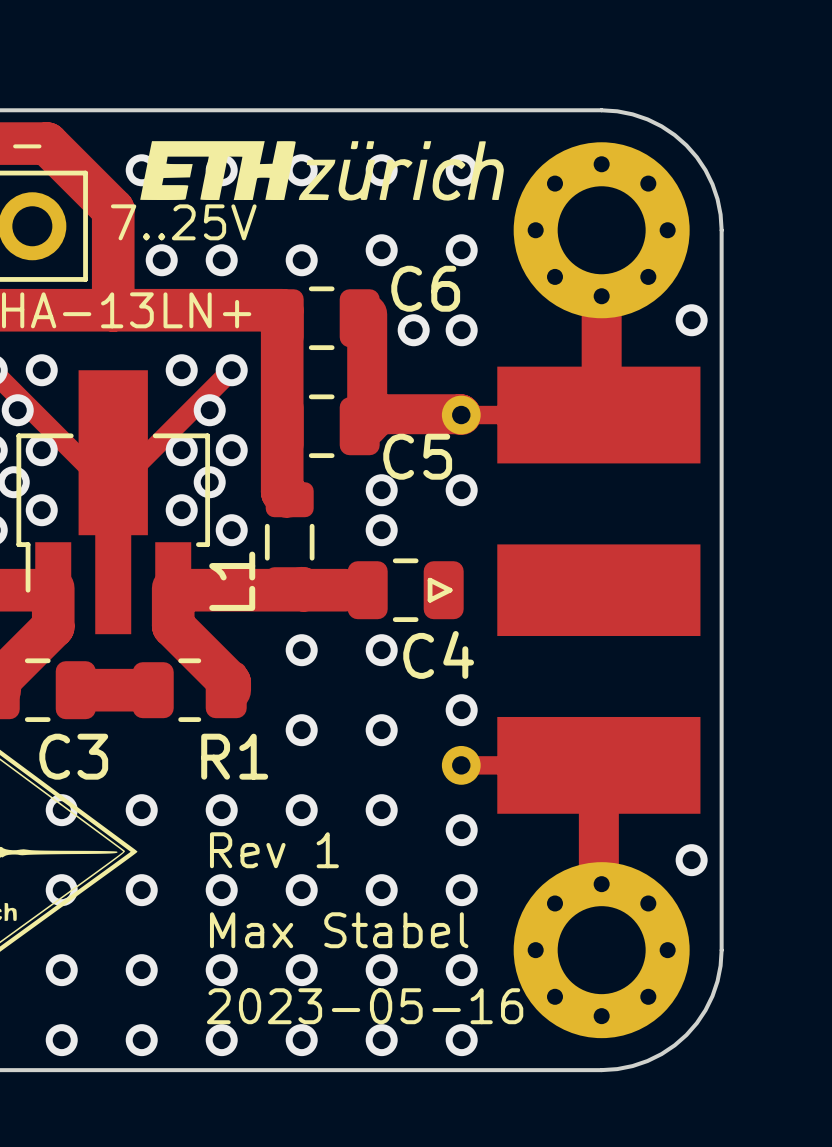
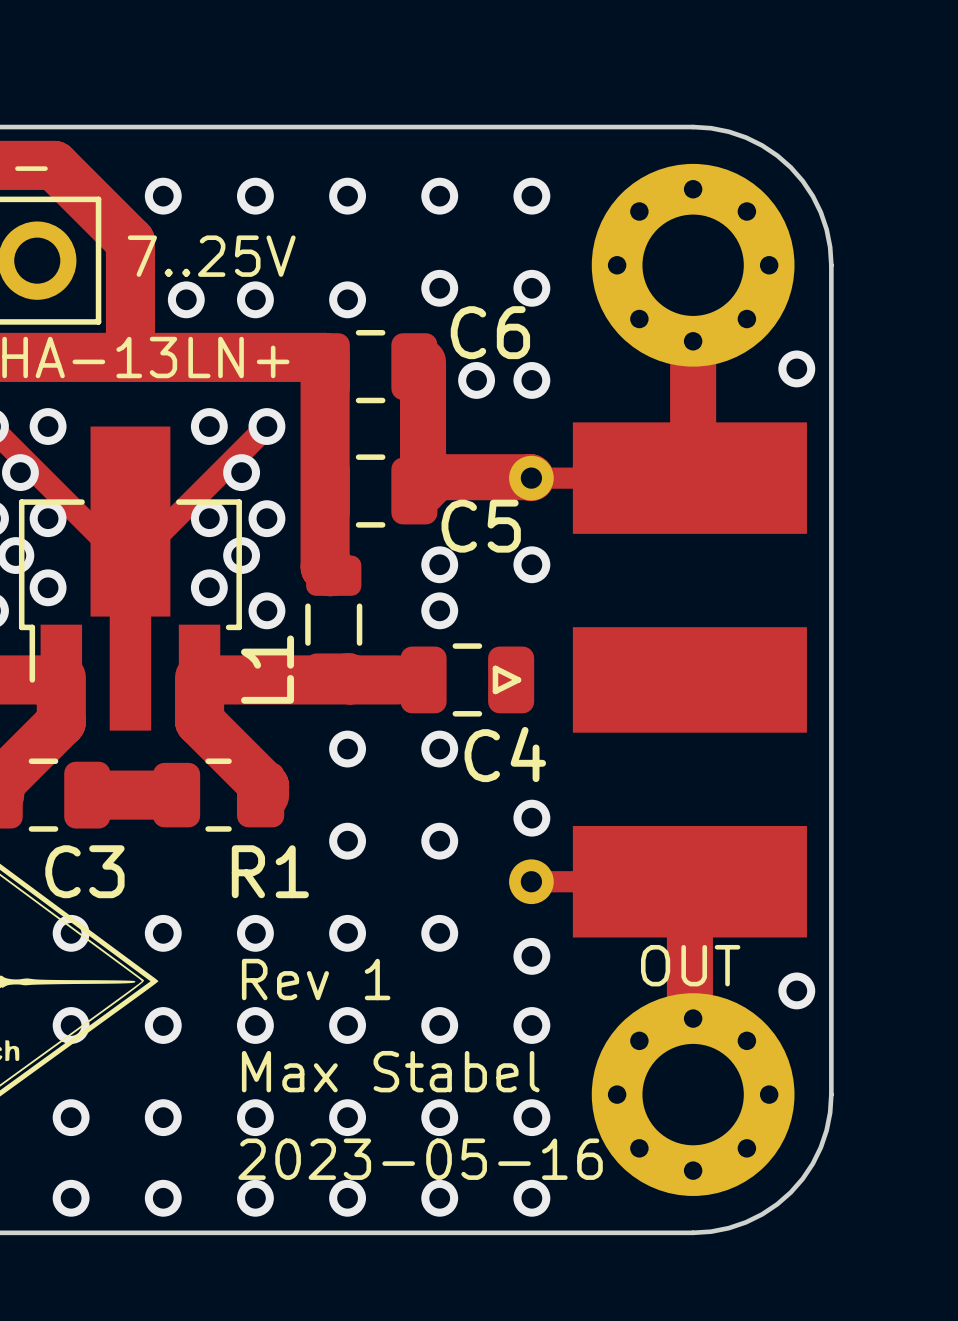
drawing: [140, 141, 504, 201] -> none
text: none -> OUT (690, 965)

